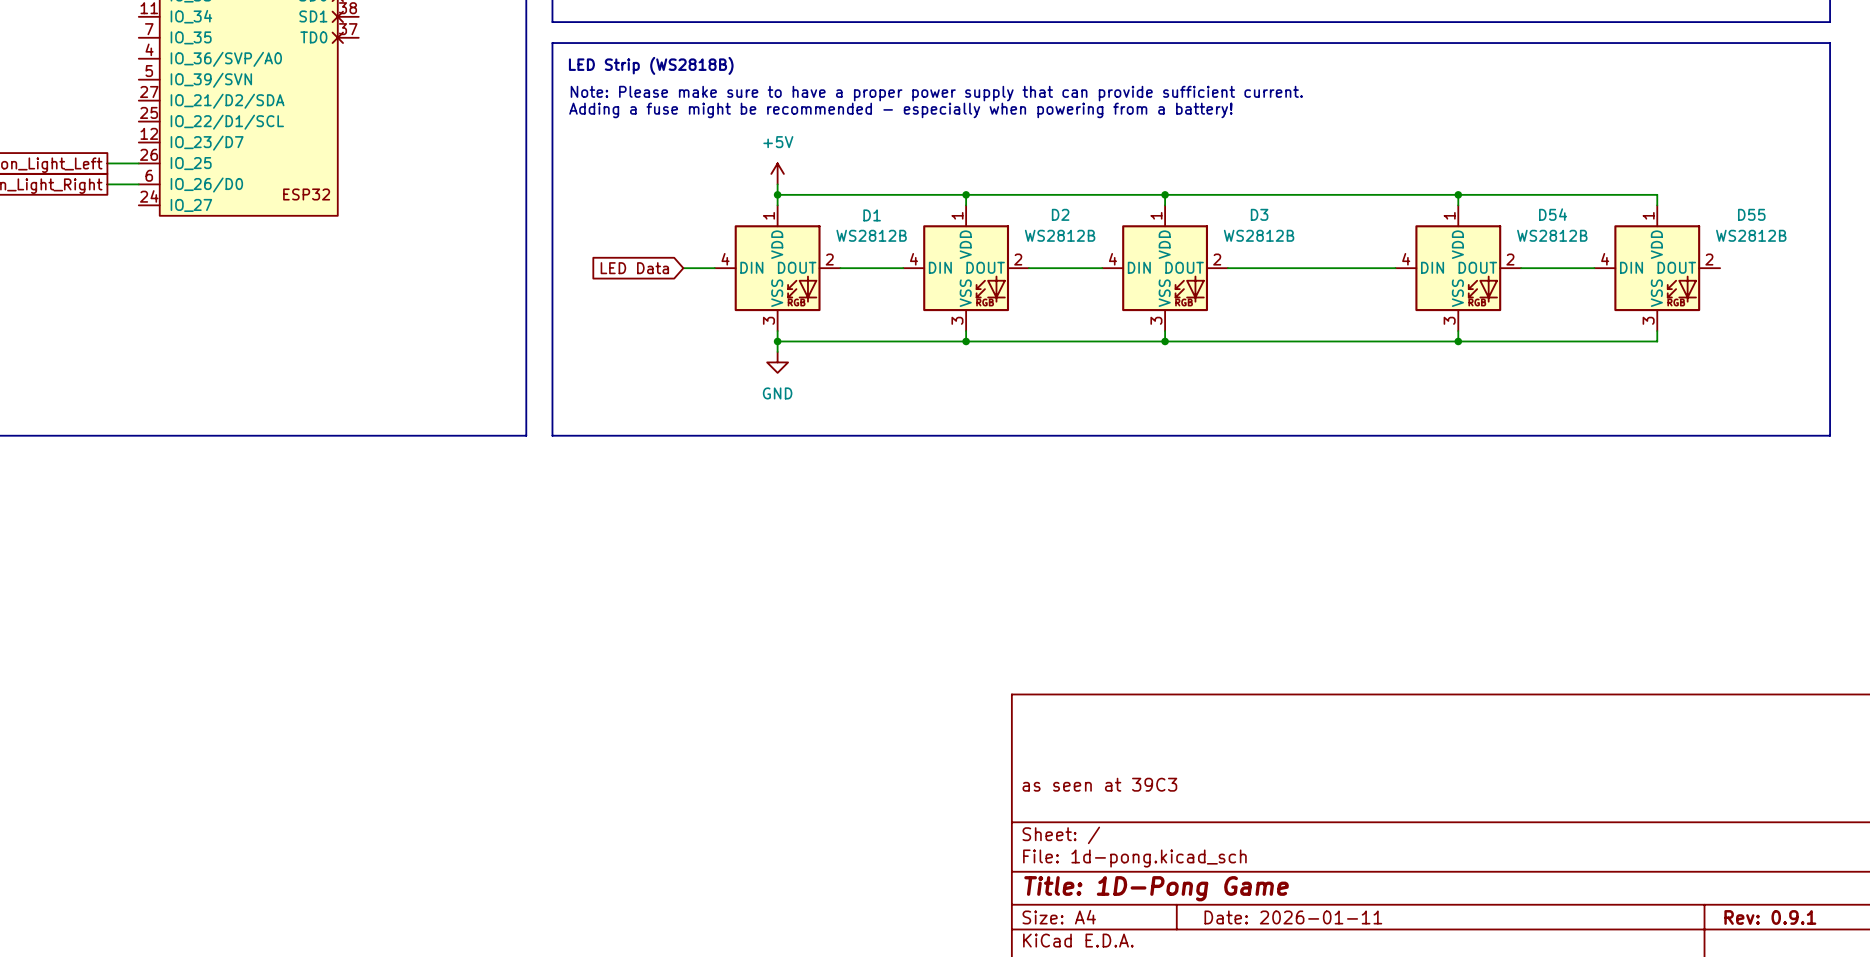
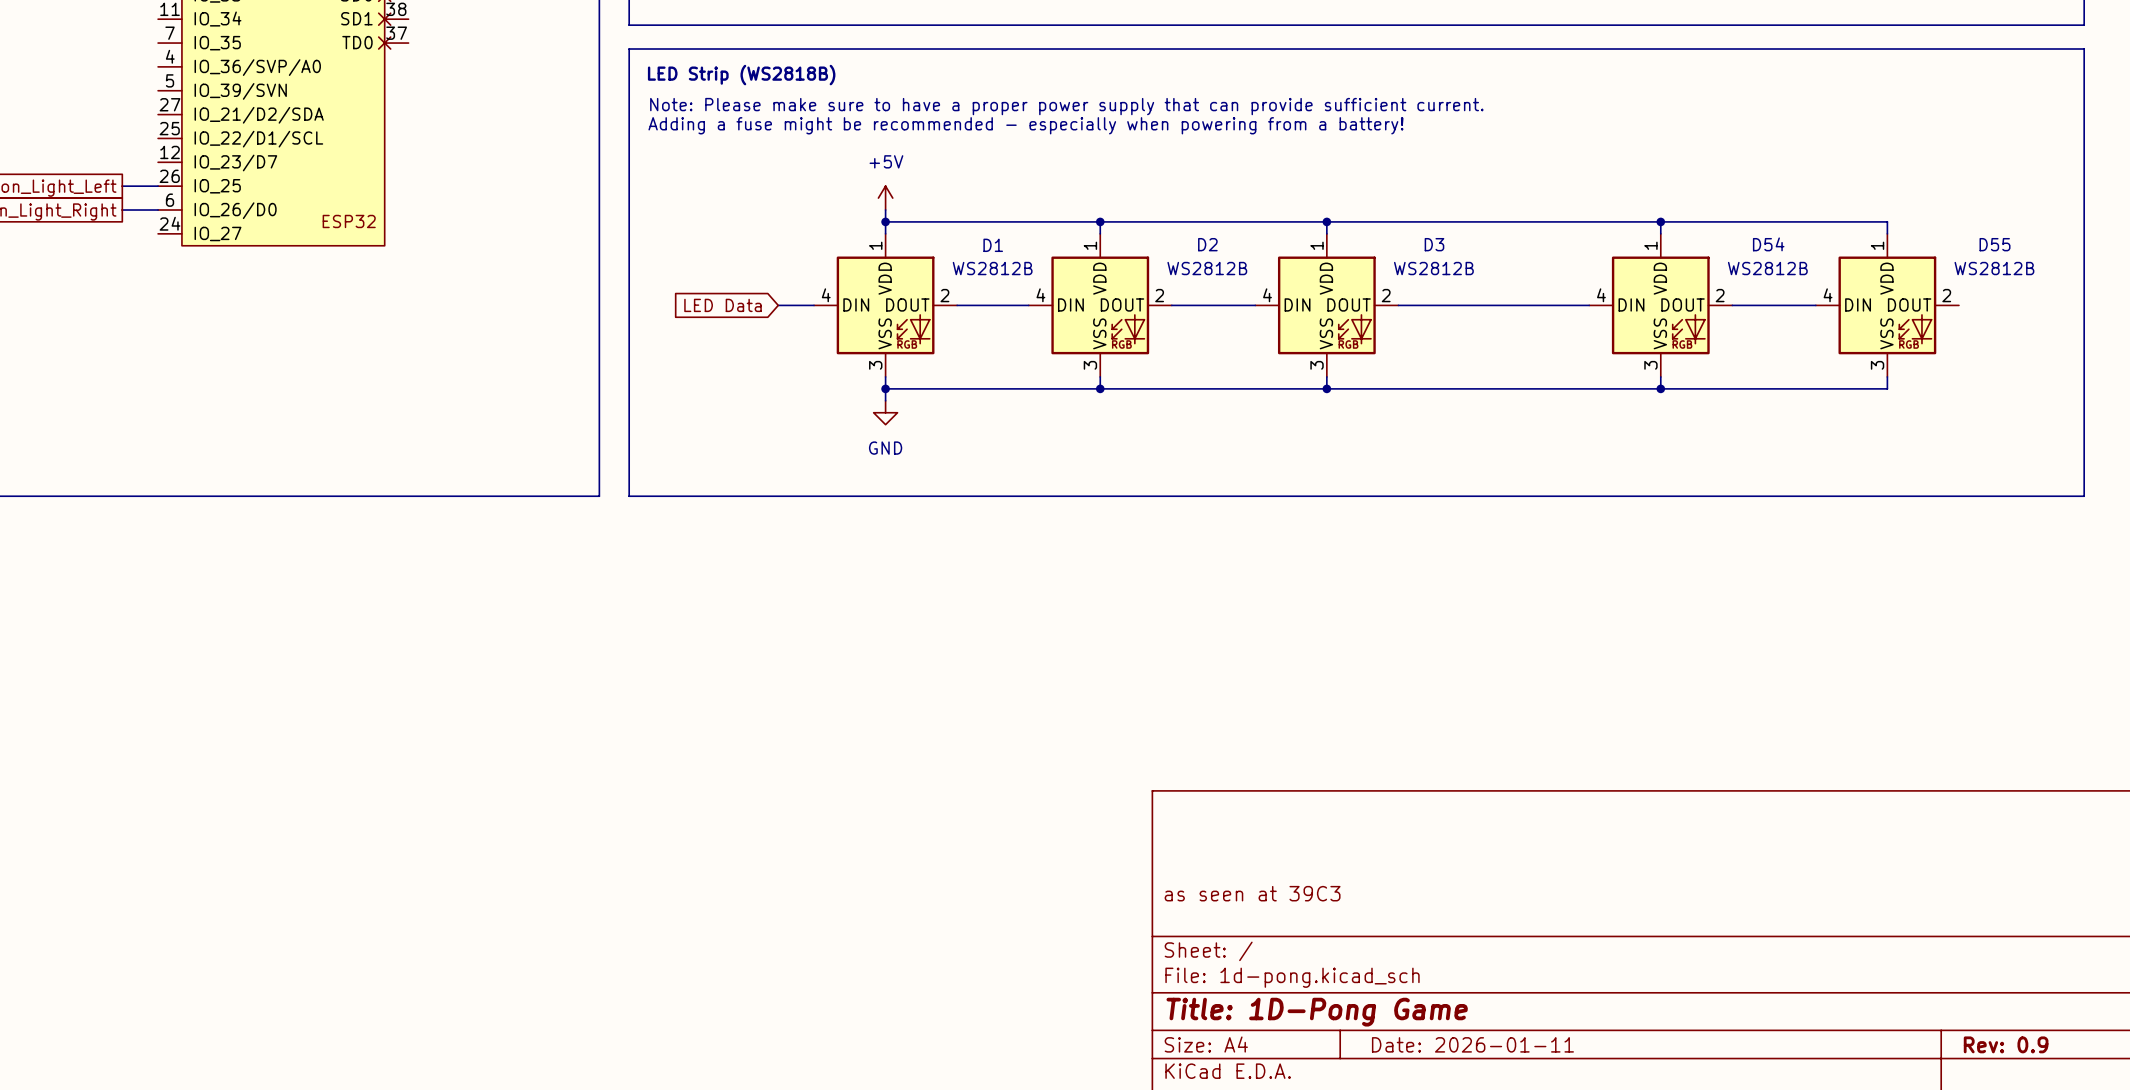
title block: Rev: 0.9.1 (1770, 917) -> Rev: 0.9 (2006, 1044)

